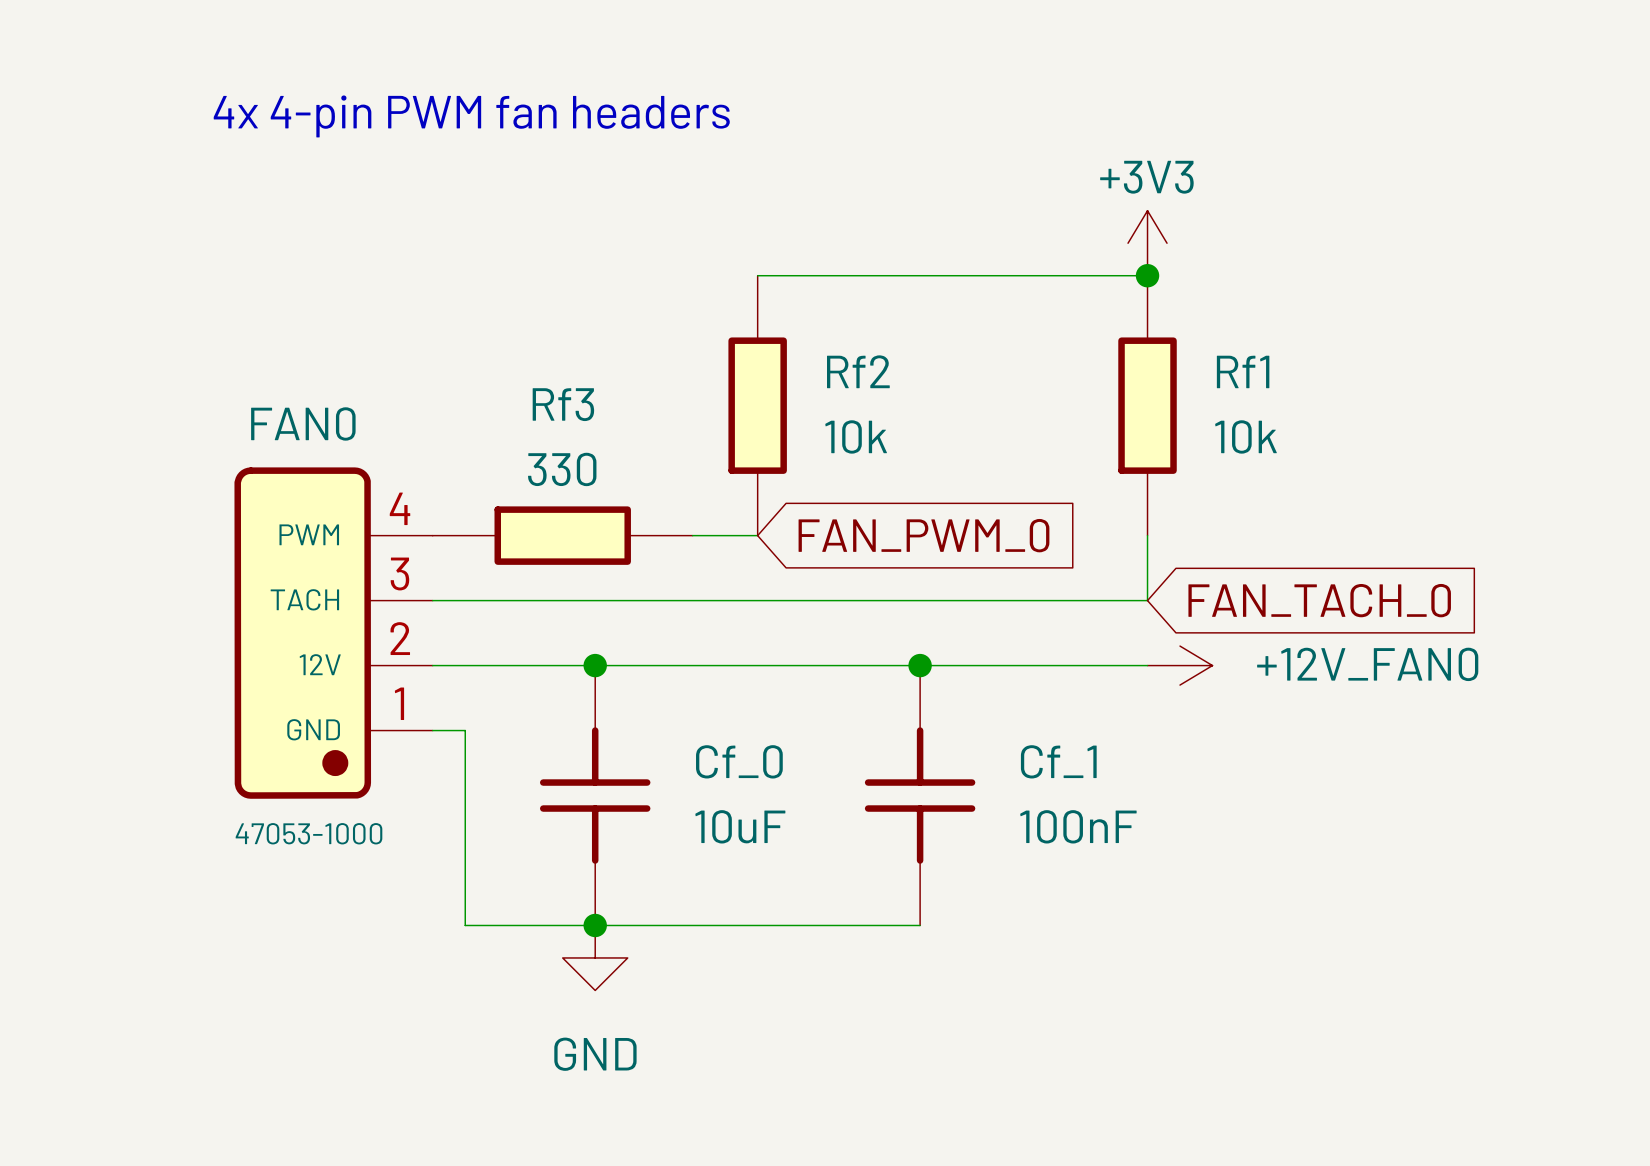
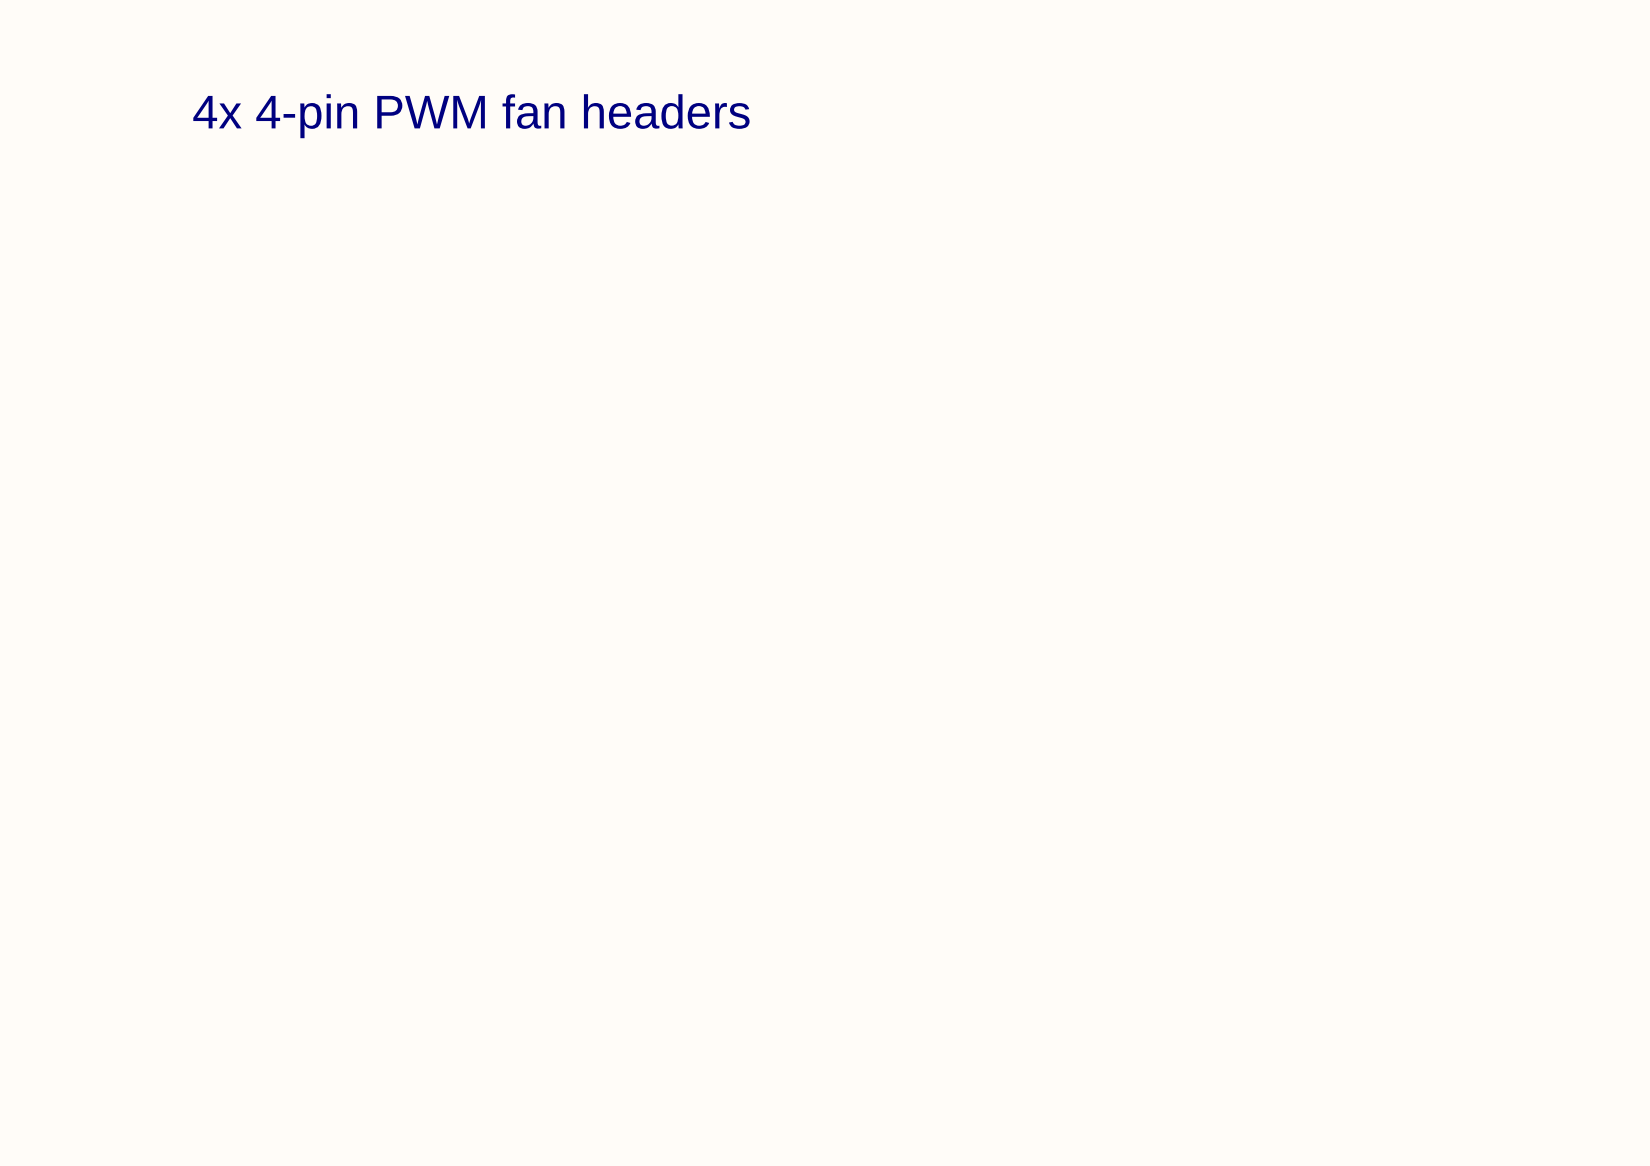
power symbol: +3V3 (1147, 243) -> none
wire: (757, 275) (1147, 275) -> none
junction: (1147, 275) -> none
Rf2: 10k (757, 405) -> none
Rf1: 10k (1147, 405) -> none
Rf3: 330 (562, 535) -> none
wire: (692, 535) (757, 535) -> none
global label: FAN_PWM_0 (923, 535) -> none
wire: (1147, 535) (1147, 600) (432, 600) -> none
global label: FAN_TACH_0 (1319, 600) -> none
FAN0: 47053-1000 (333, 633) -> none
wire: (432, 665) (1147, 665) -> none
junction: (595, 665) -> none
junction: (920, 665) -> none
power symbol: +12V_FAN0 (1180, 665) -> none
wire: (432, 730) (465, 730) (465, 925) (920, 925) -> none
Cf_0: 10uF (595, 795) -> none
Cf_1: 100nF (920, 795) -> none
junction: (595, 925) -> none
power symbol: GND (595, 957) -> none

